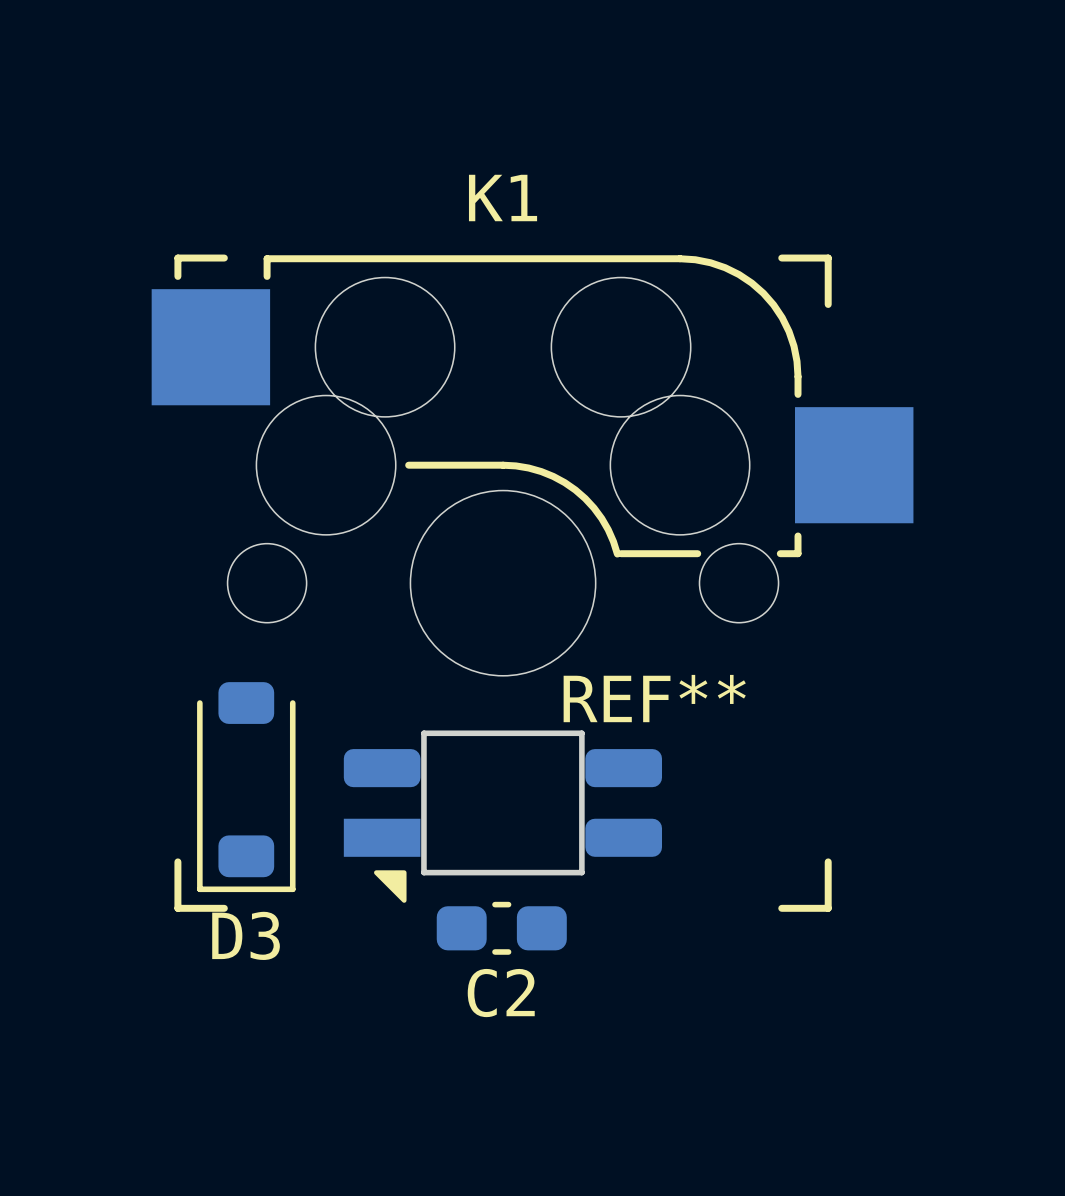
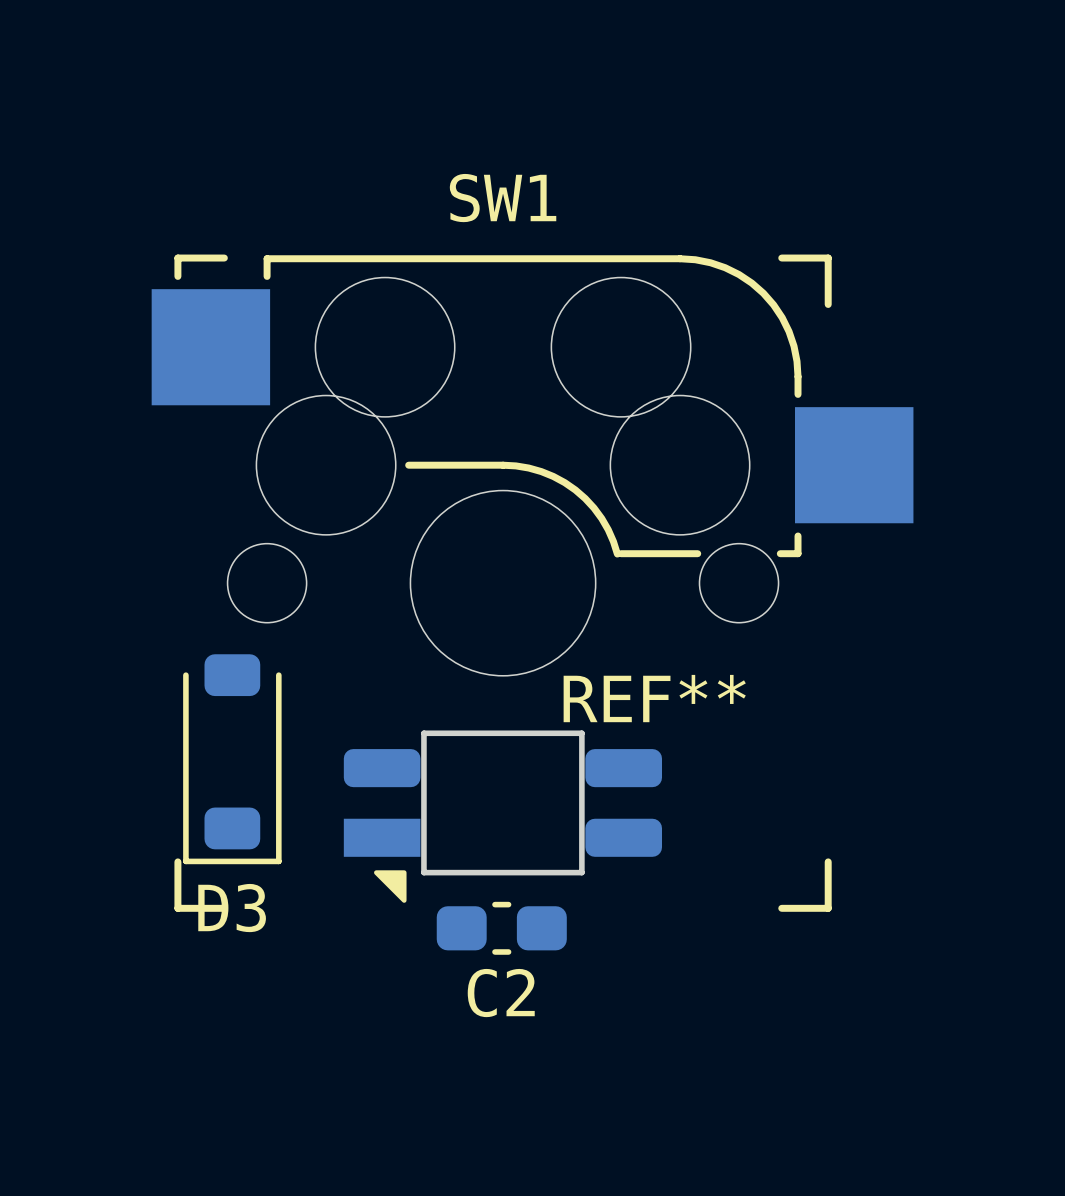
K1 name: K1 (503, 198) -> SW1 (503, 198)
D3 position: (246, 787) -> (232, 759)

